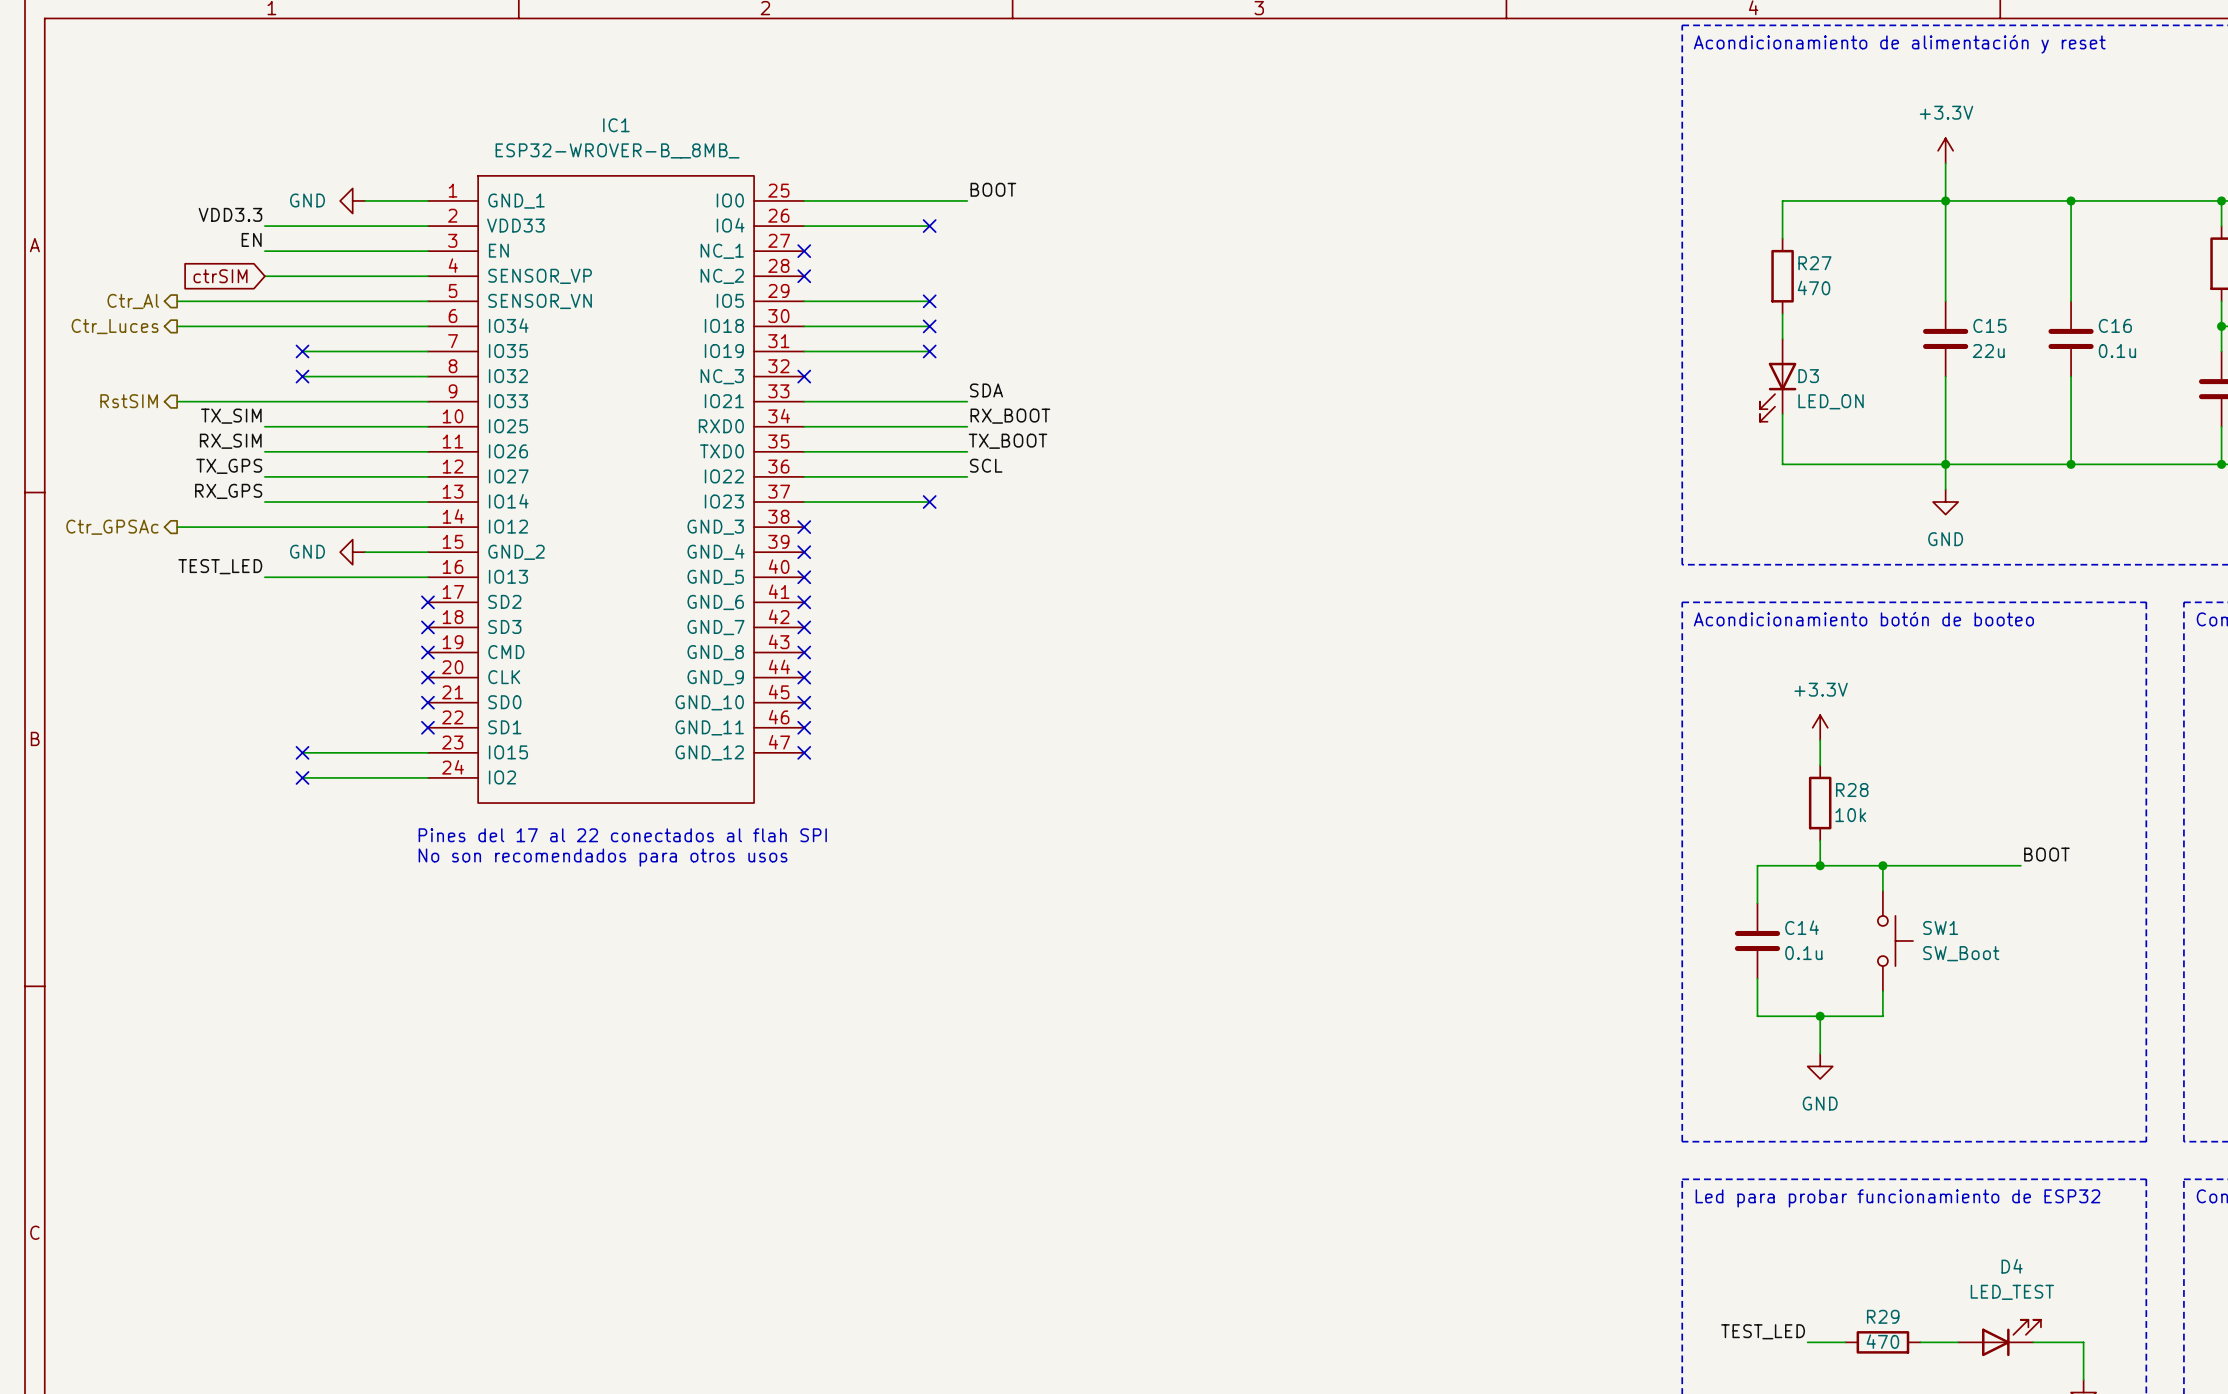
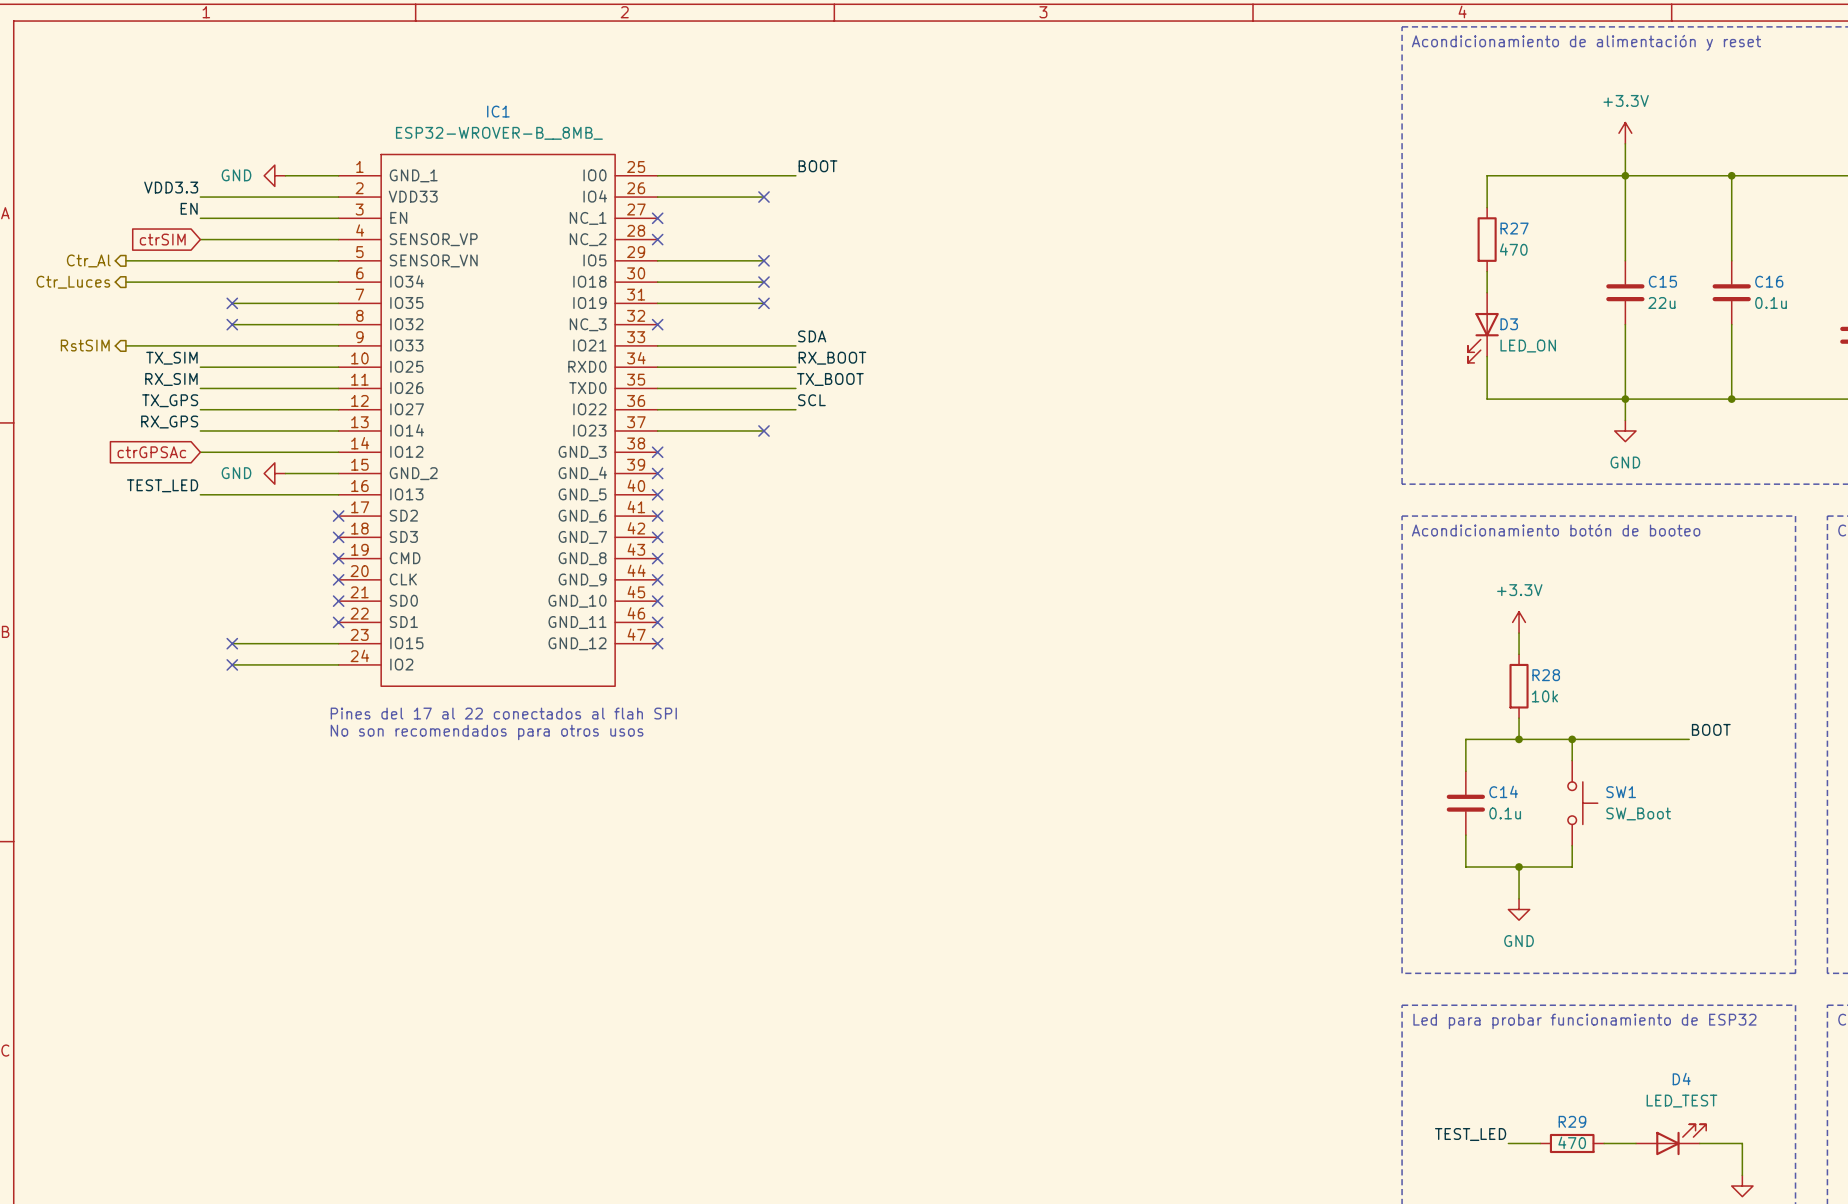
hierarchical label: Ctr_GPSAc (112, 527) -> none
wire: (177, 527) (264, 527) -> none
global label: none -> ctrGPSAc (151, 452)

